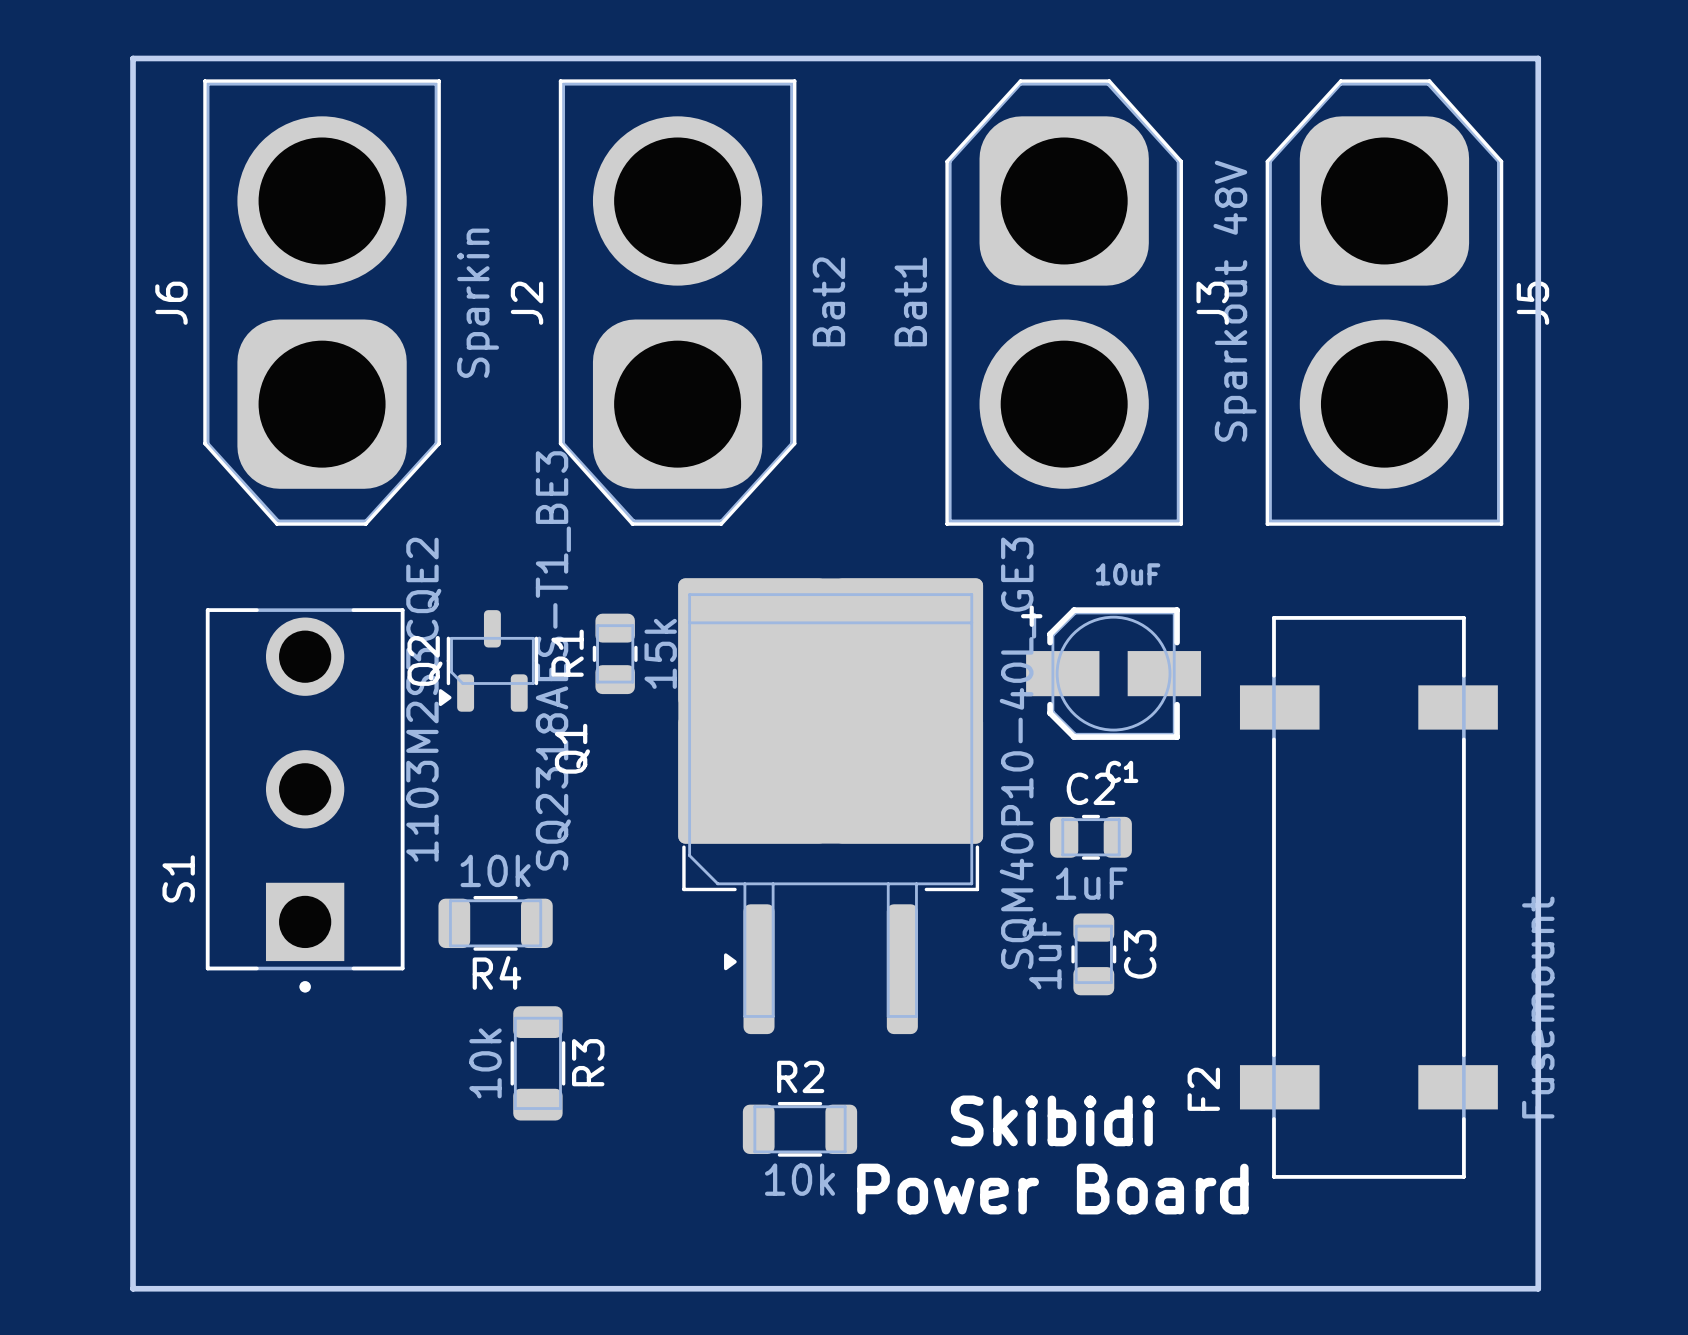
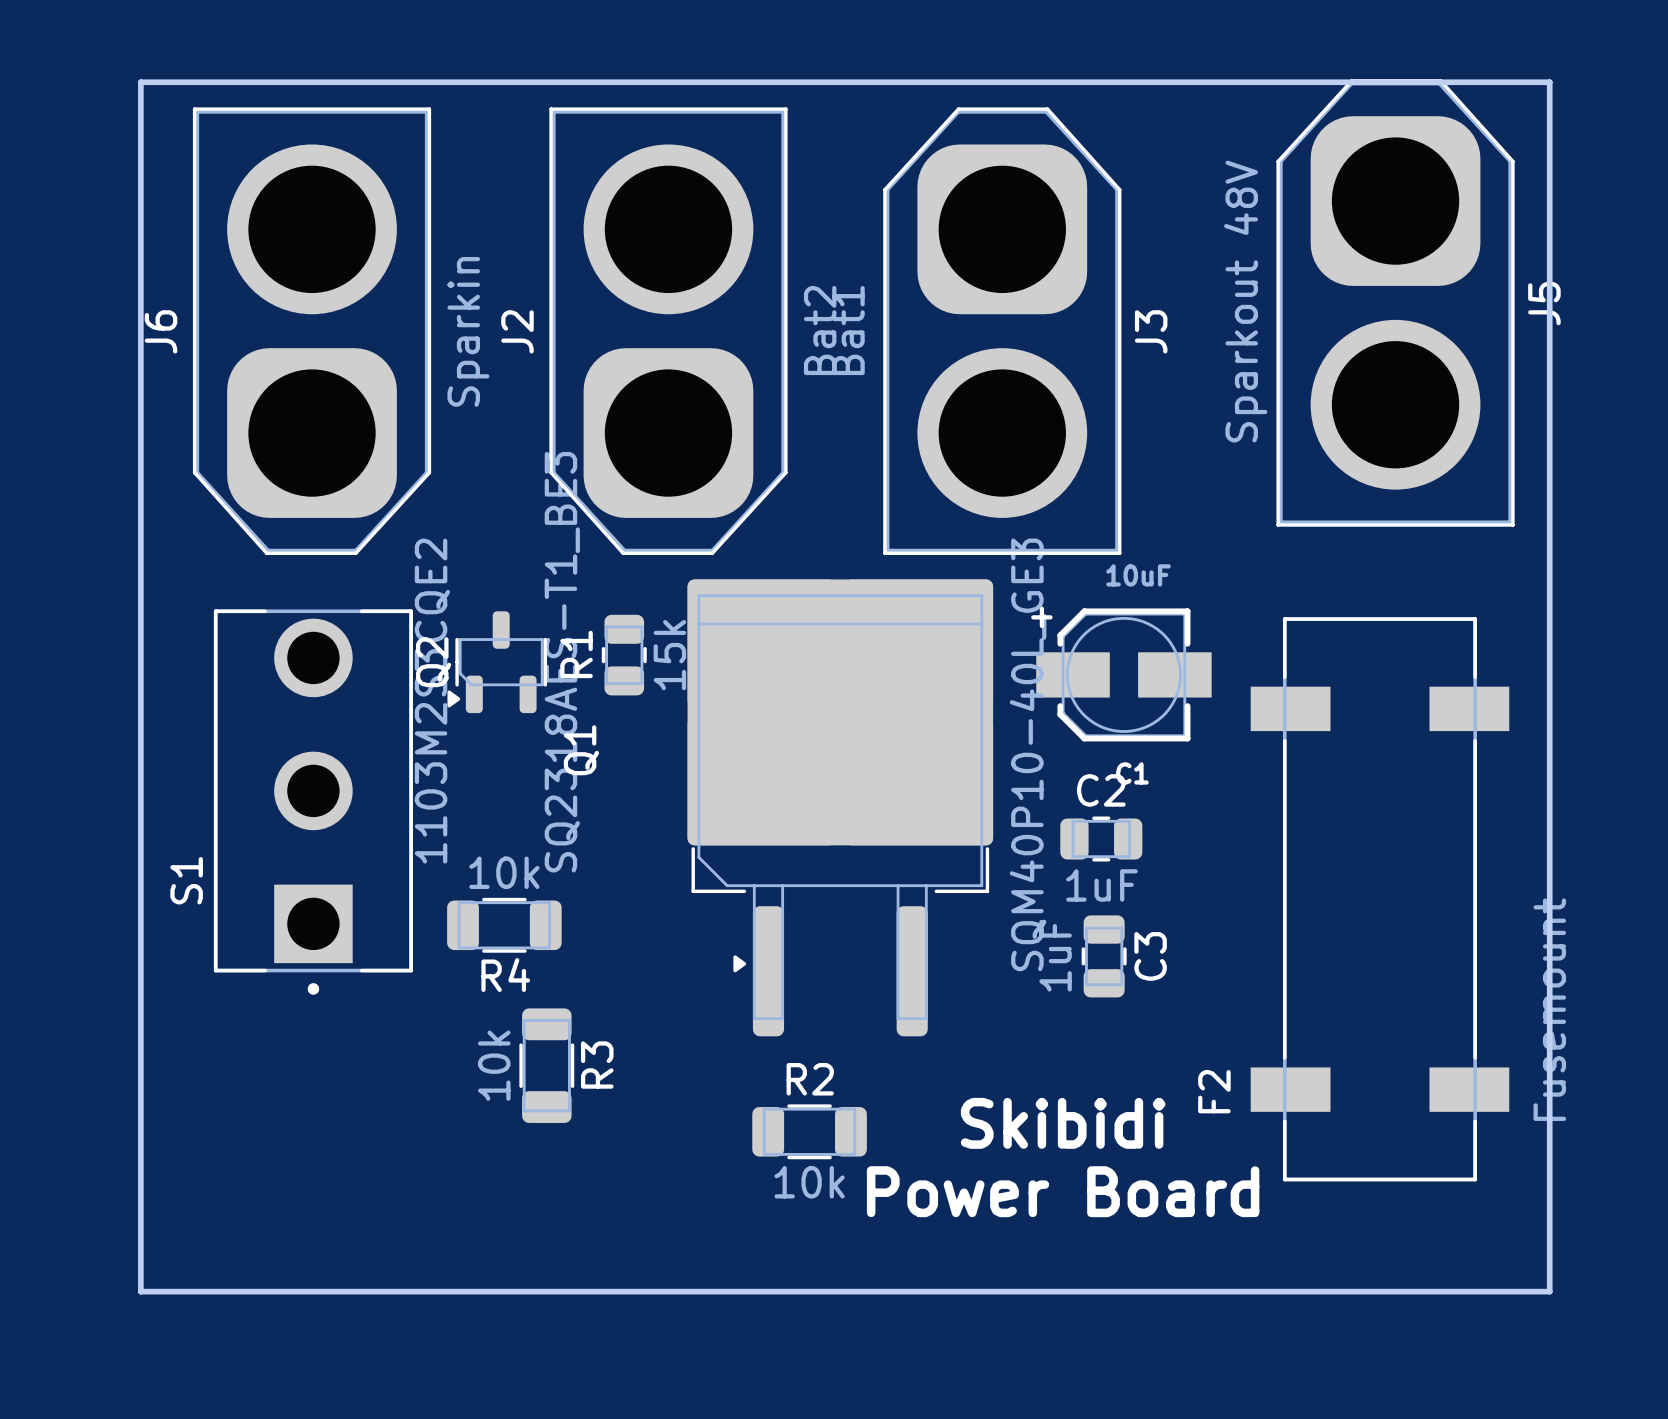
board edge: (133, 82) (133, 58) (1538, 58) (1538, 82) -> (140, 82) (1549, 82)
J6 position: (322, 302) -> (312, 331)
J2 position: (677, 302) -> (668, 331)
J3 position: (1064, 302) -> (1002, 331)

